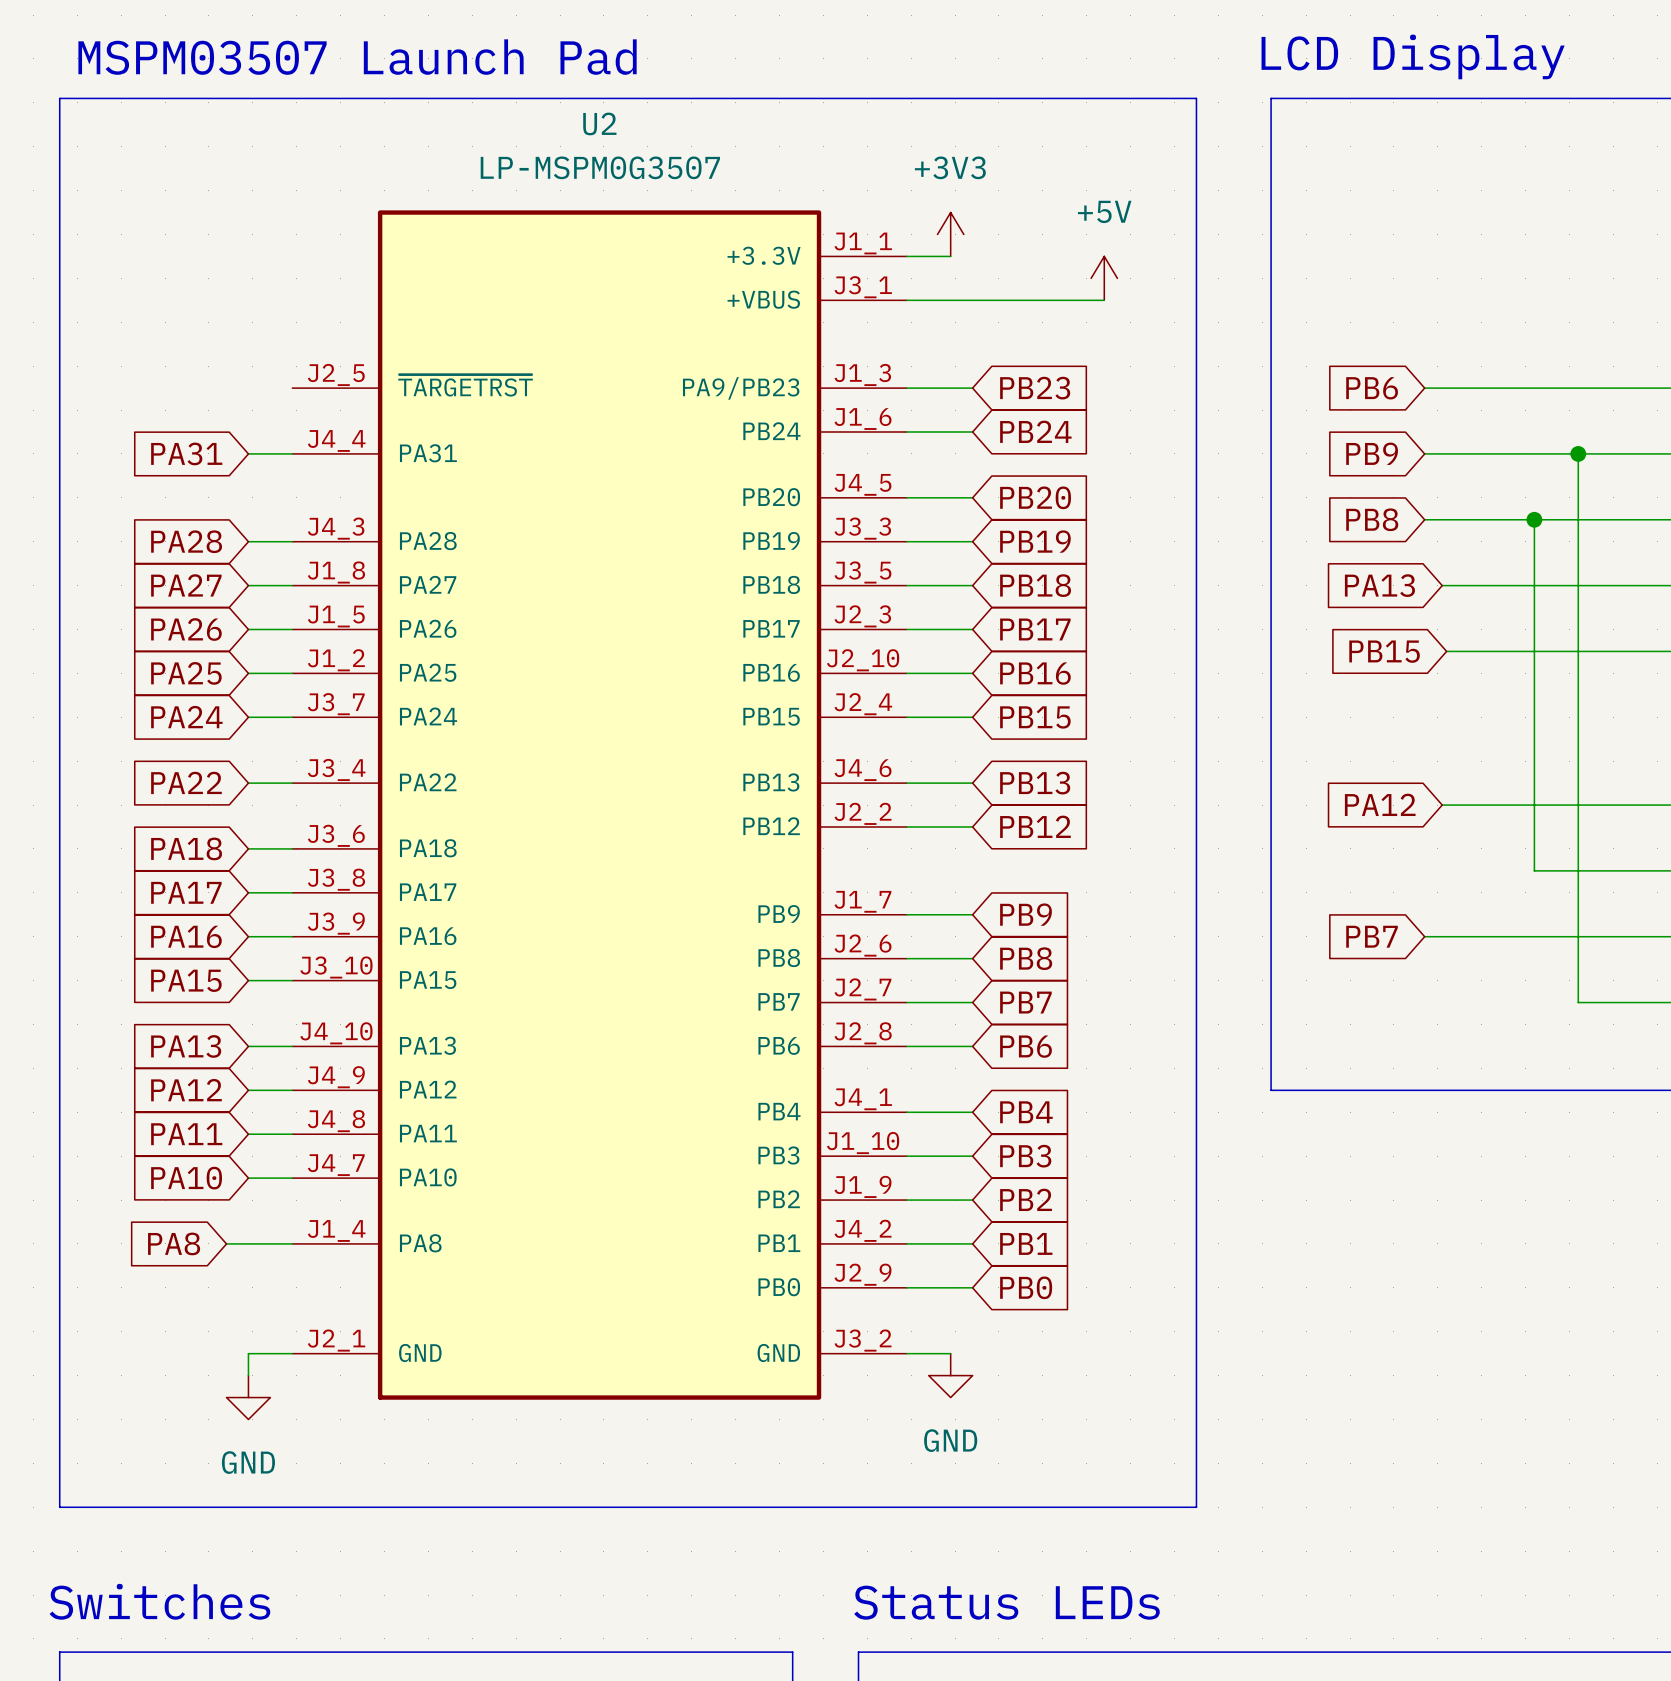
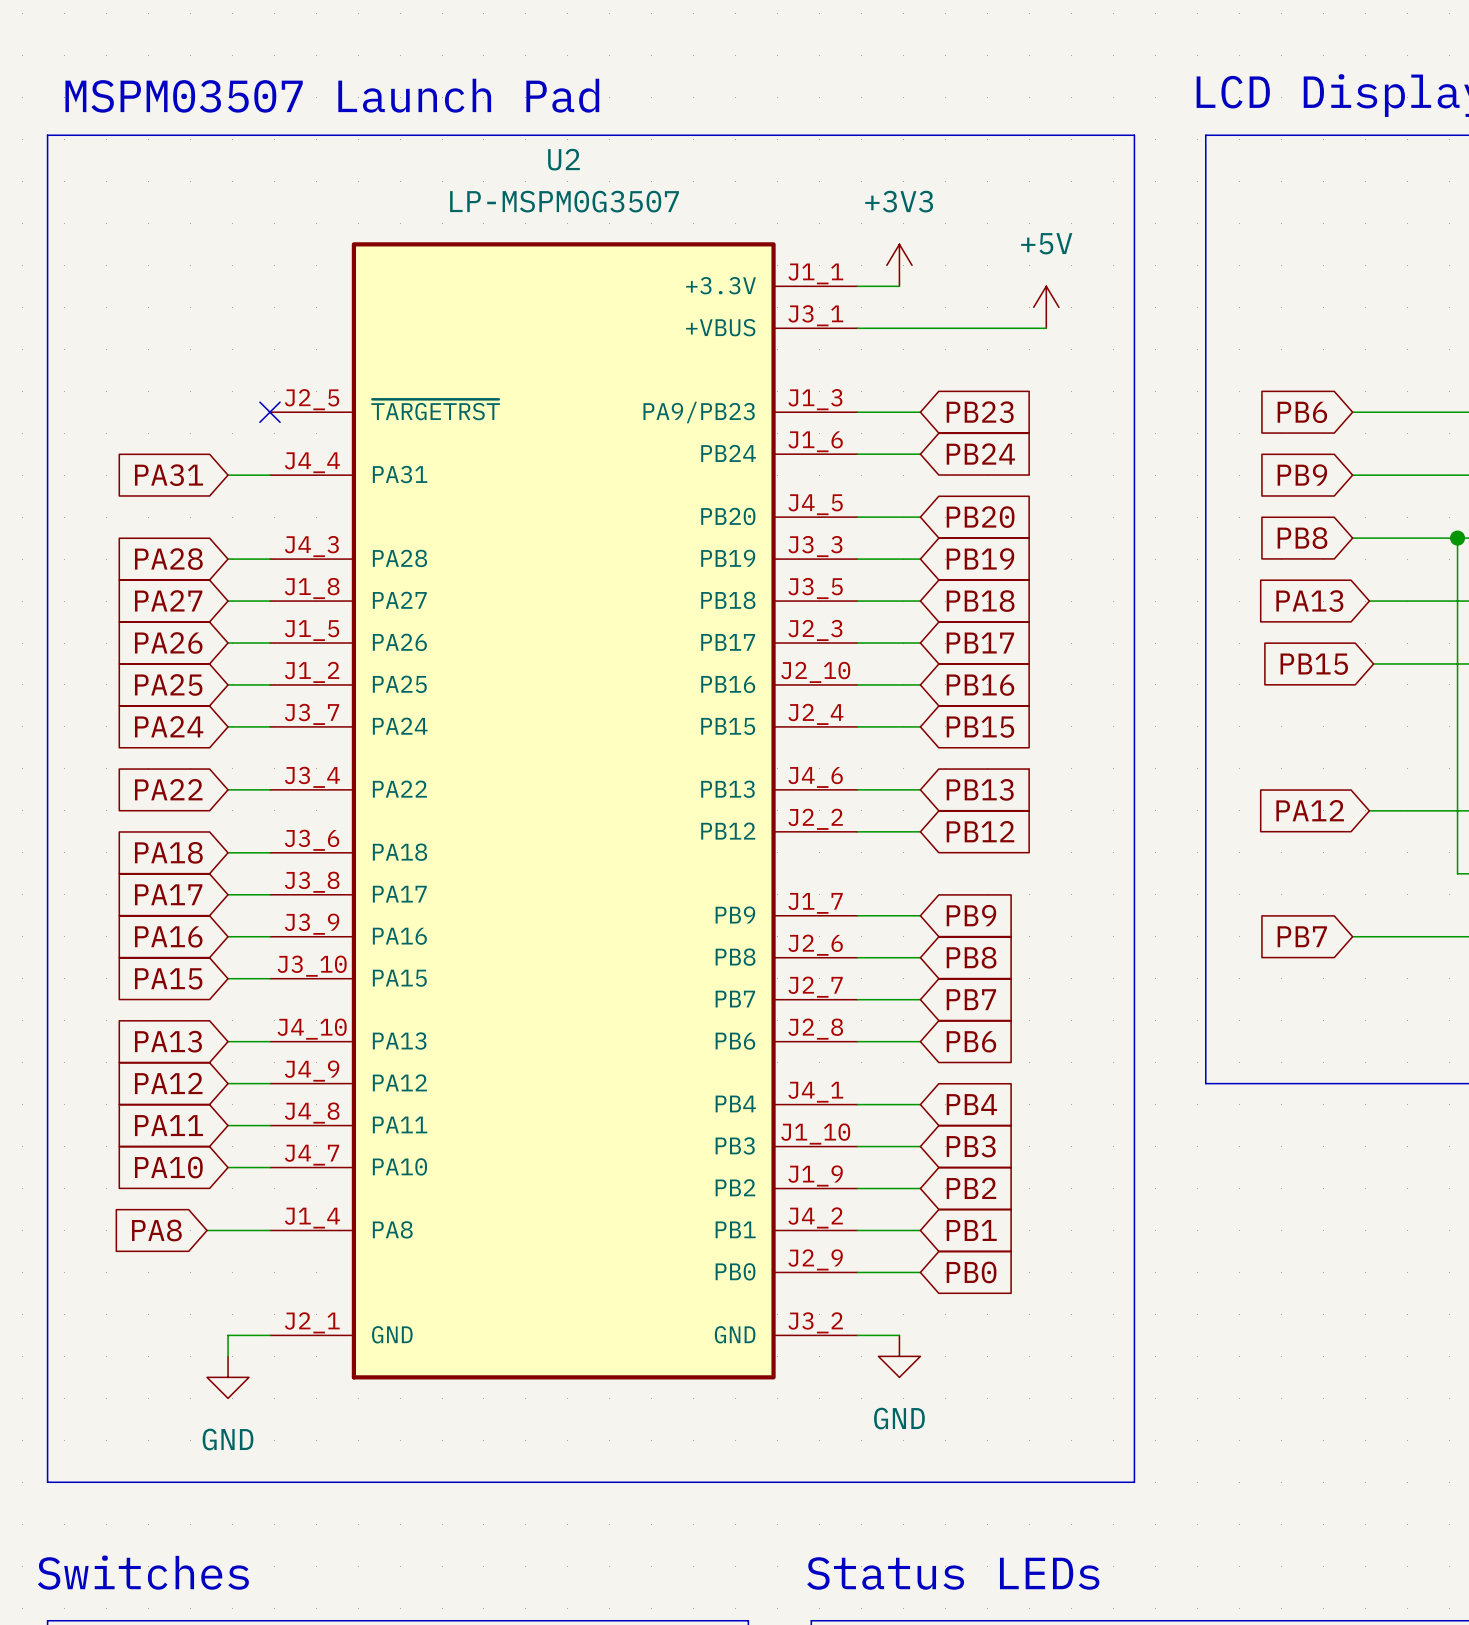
no-connect mark: none -> (269, 412)

